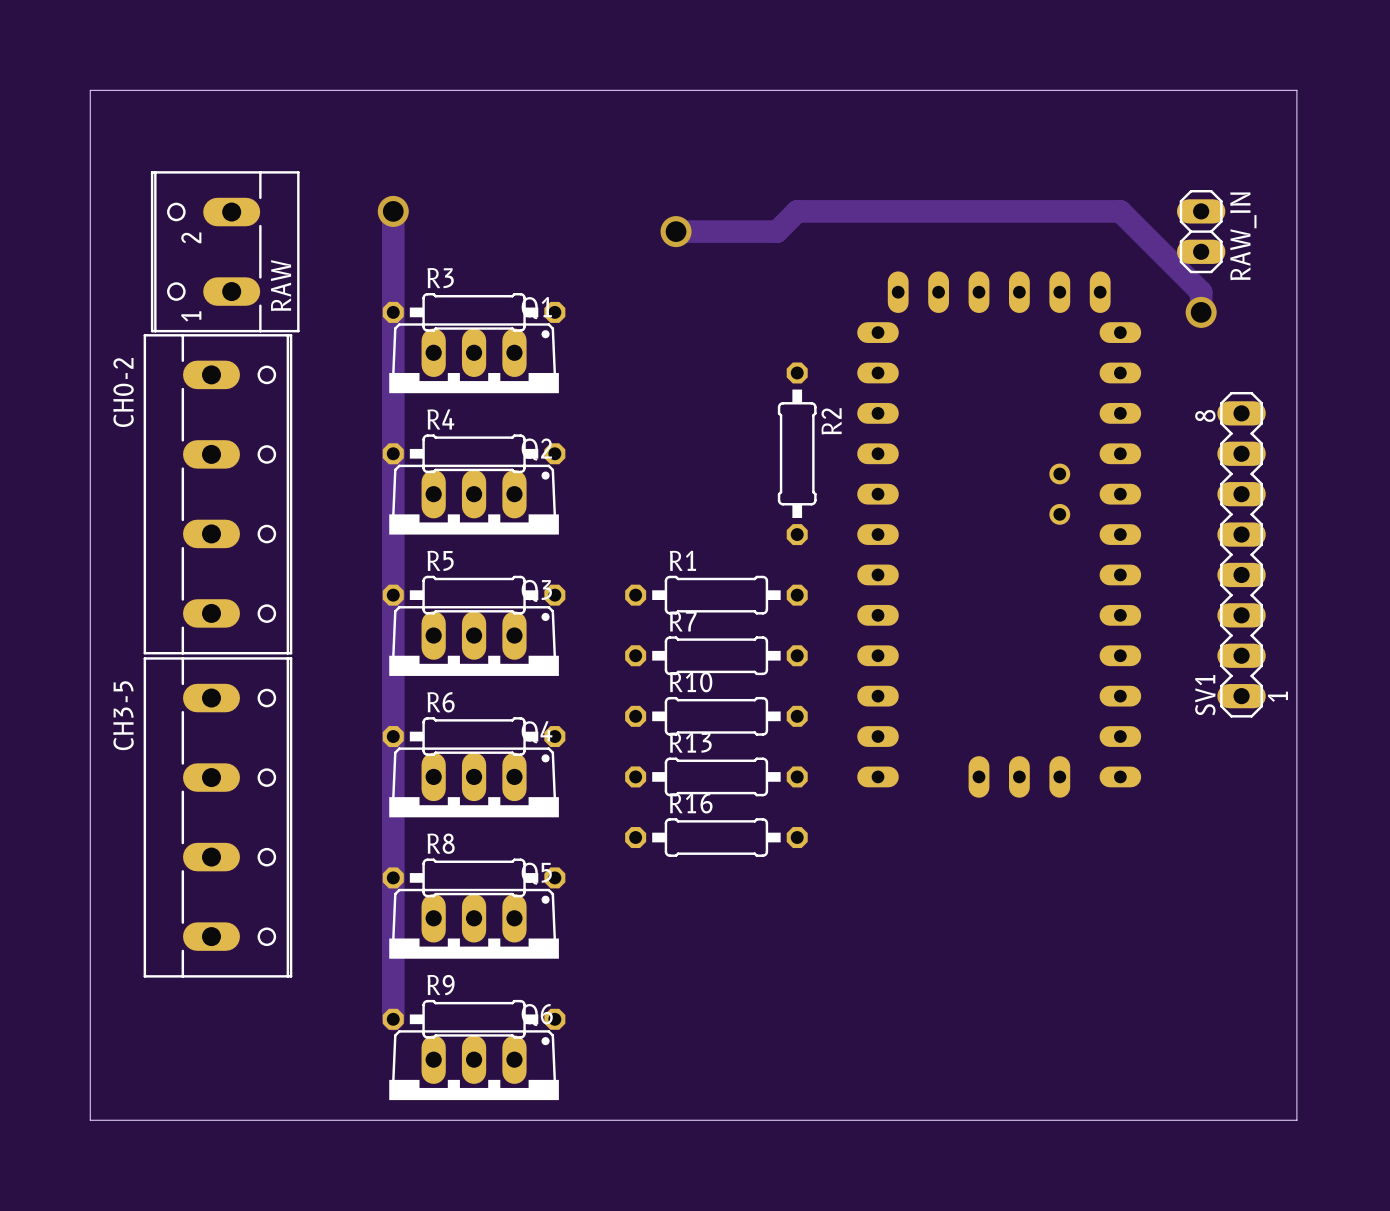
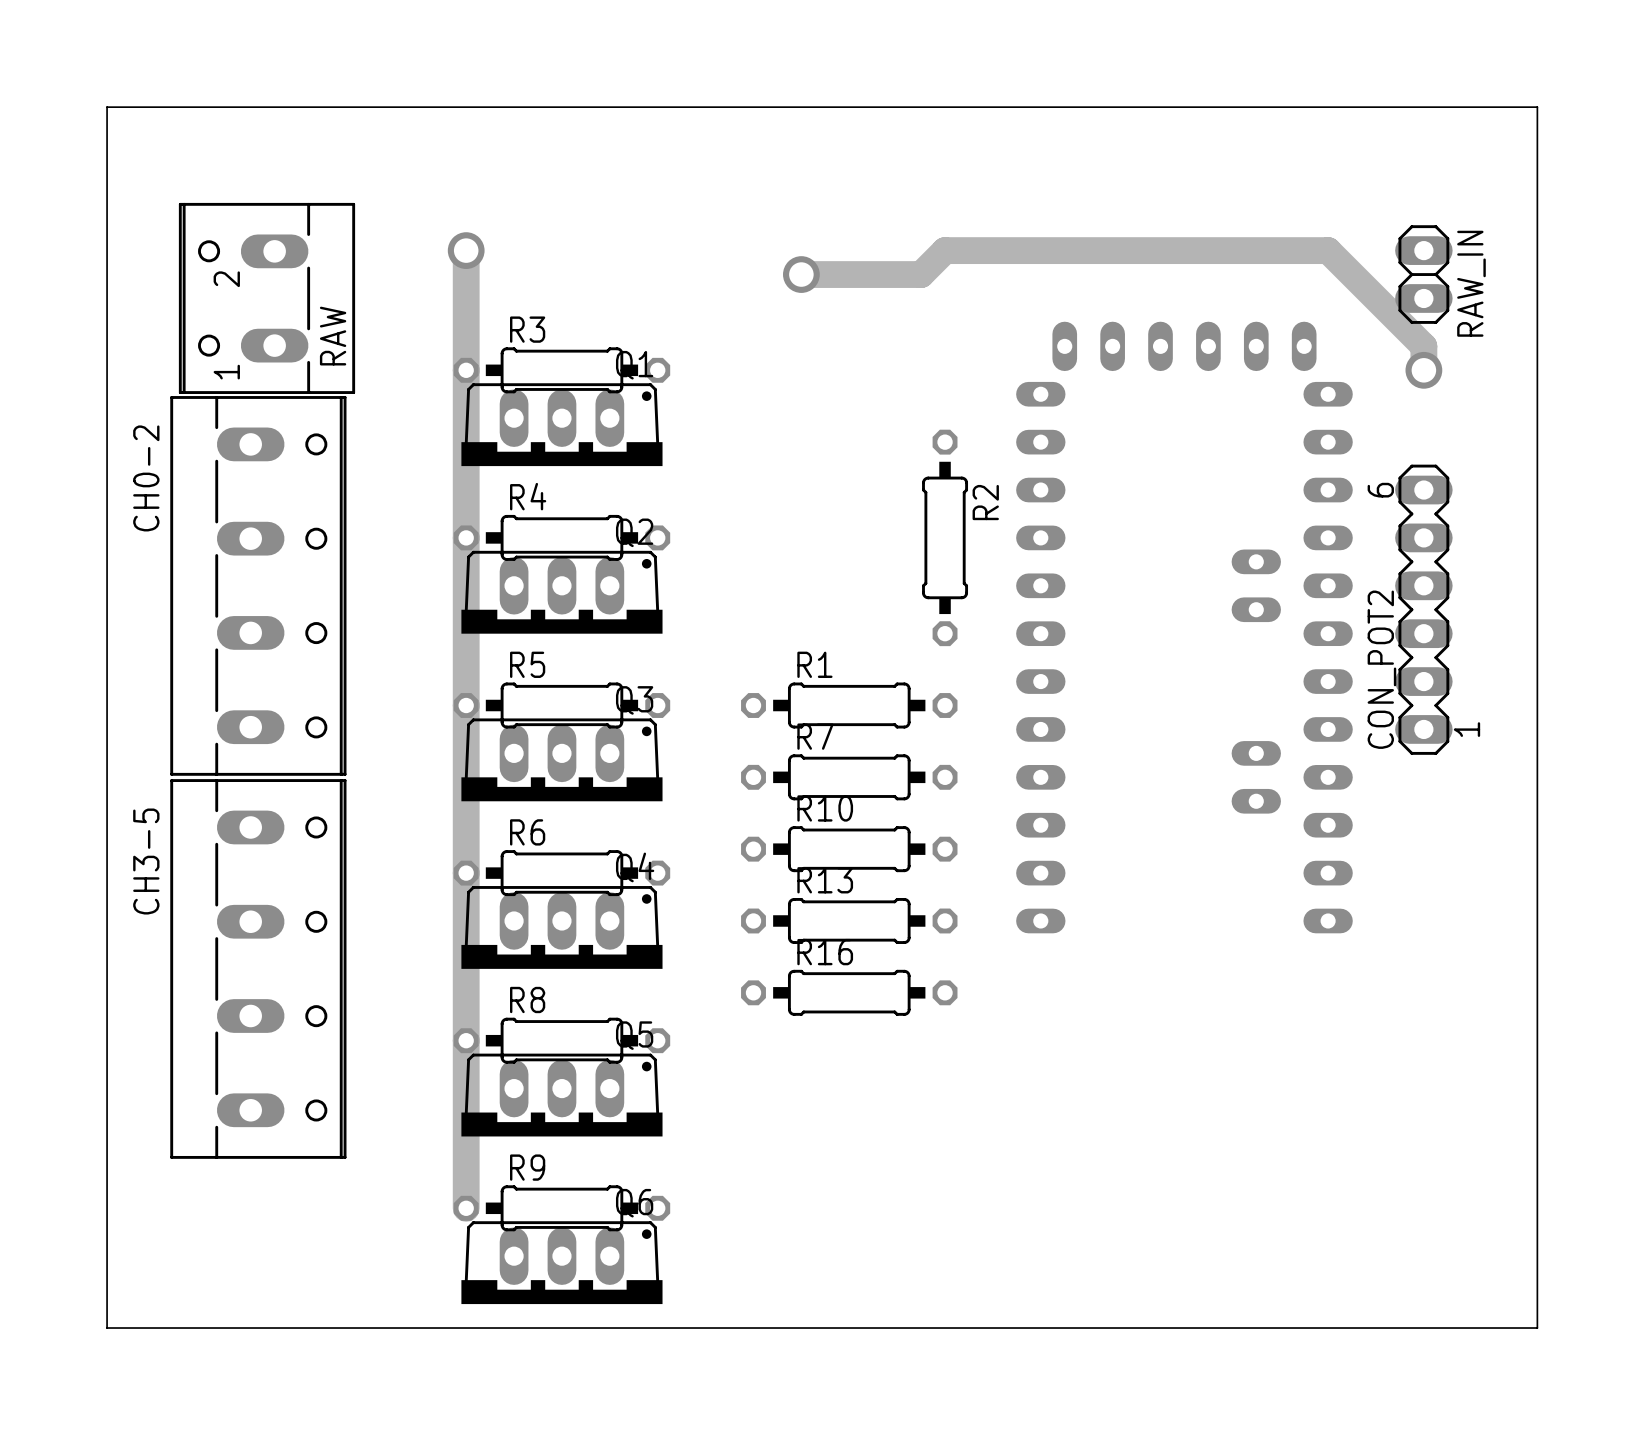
part footprint: [857, 271, 1142, 798] -> [1016, 321, 1353, 934]
CON_POT2: none -> (1423, 609)
SV1: (1241, 554) -> none

